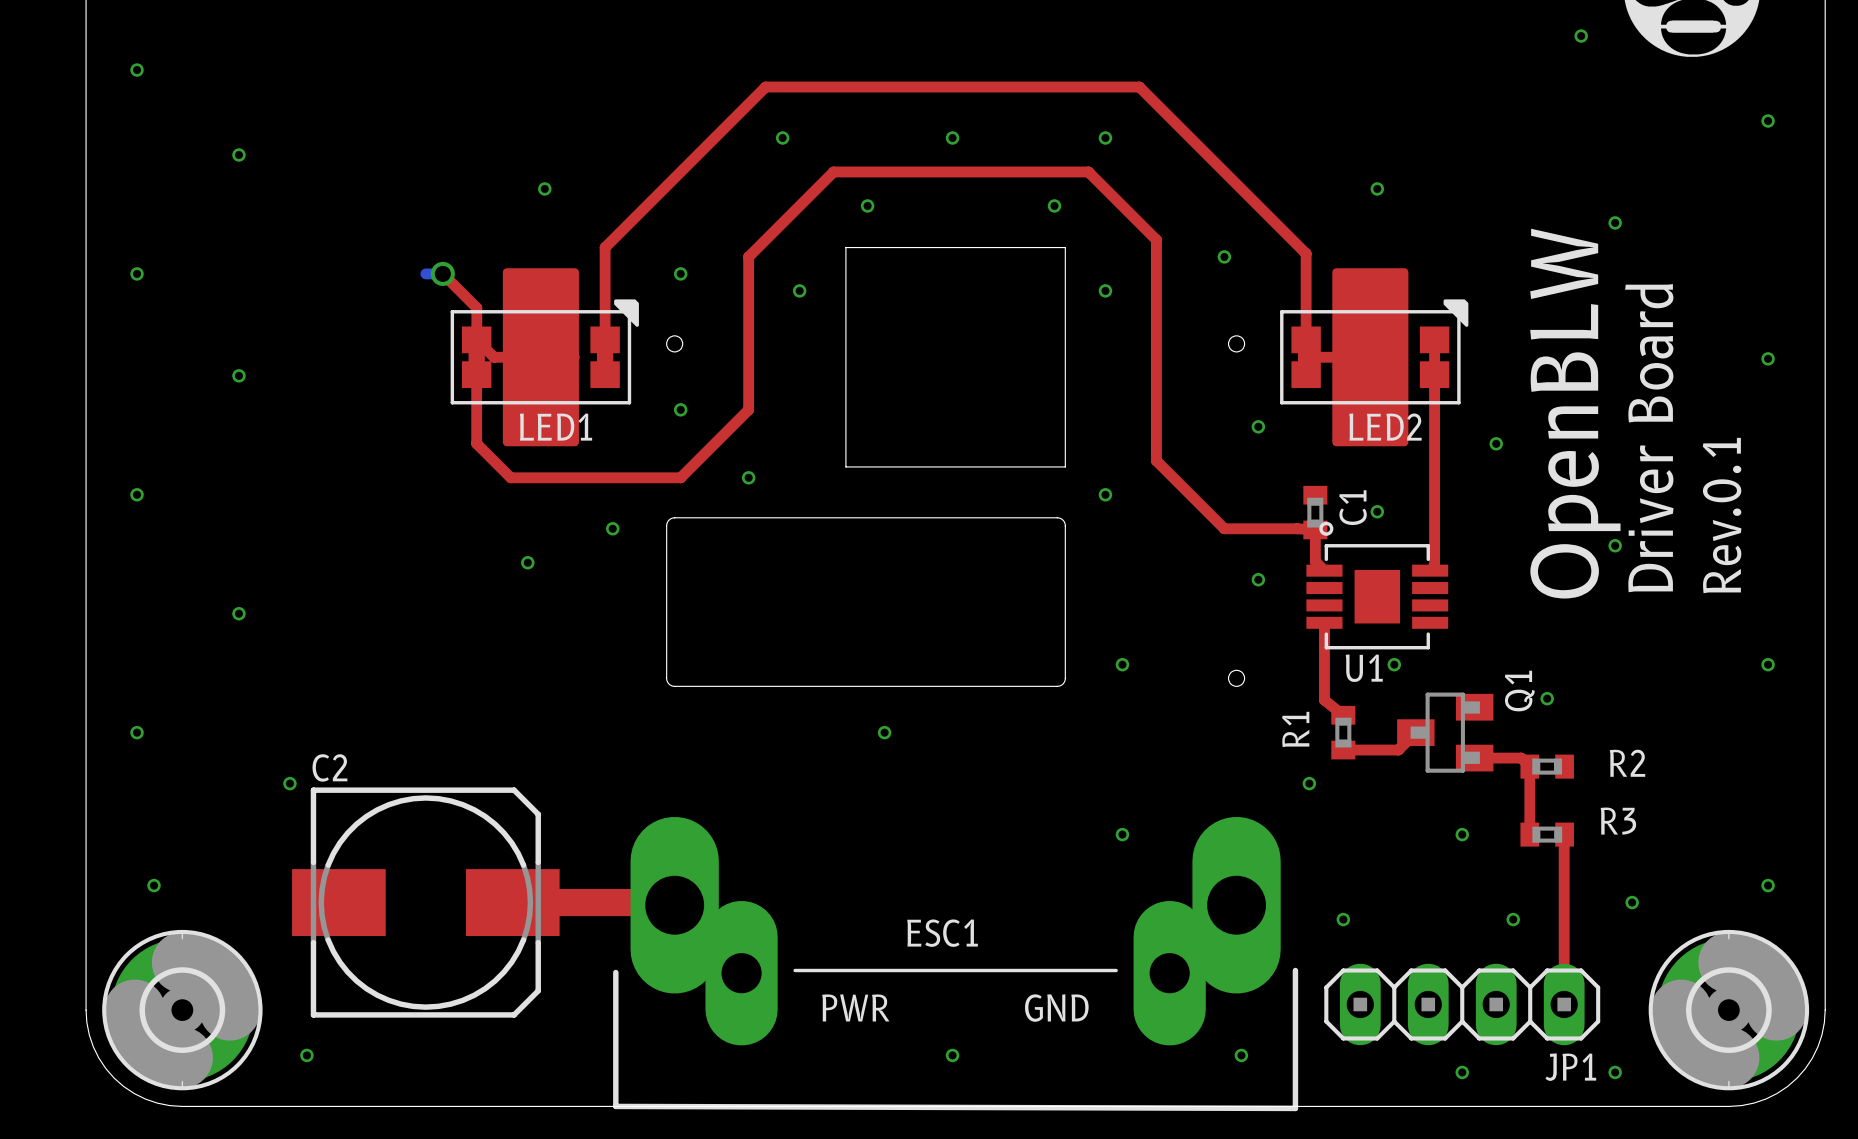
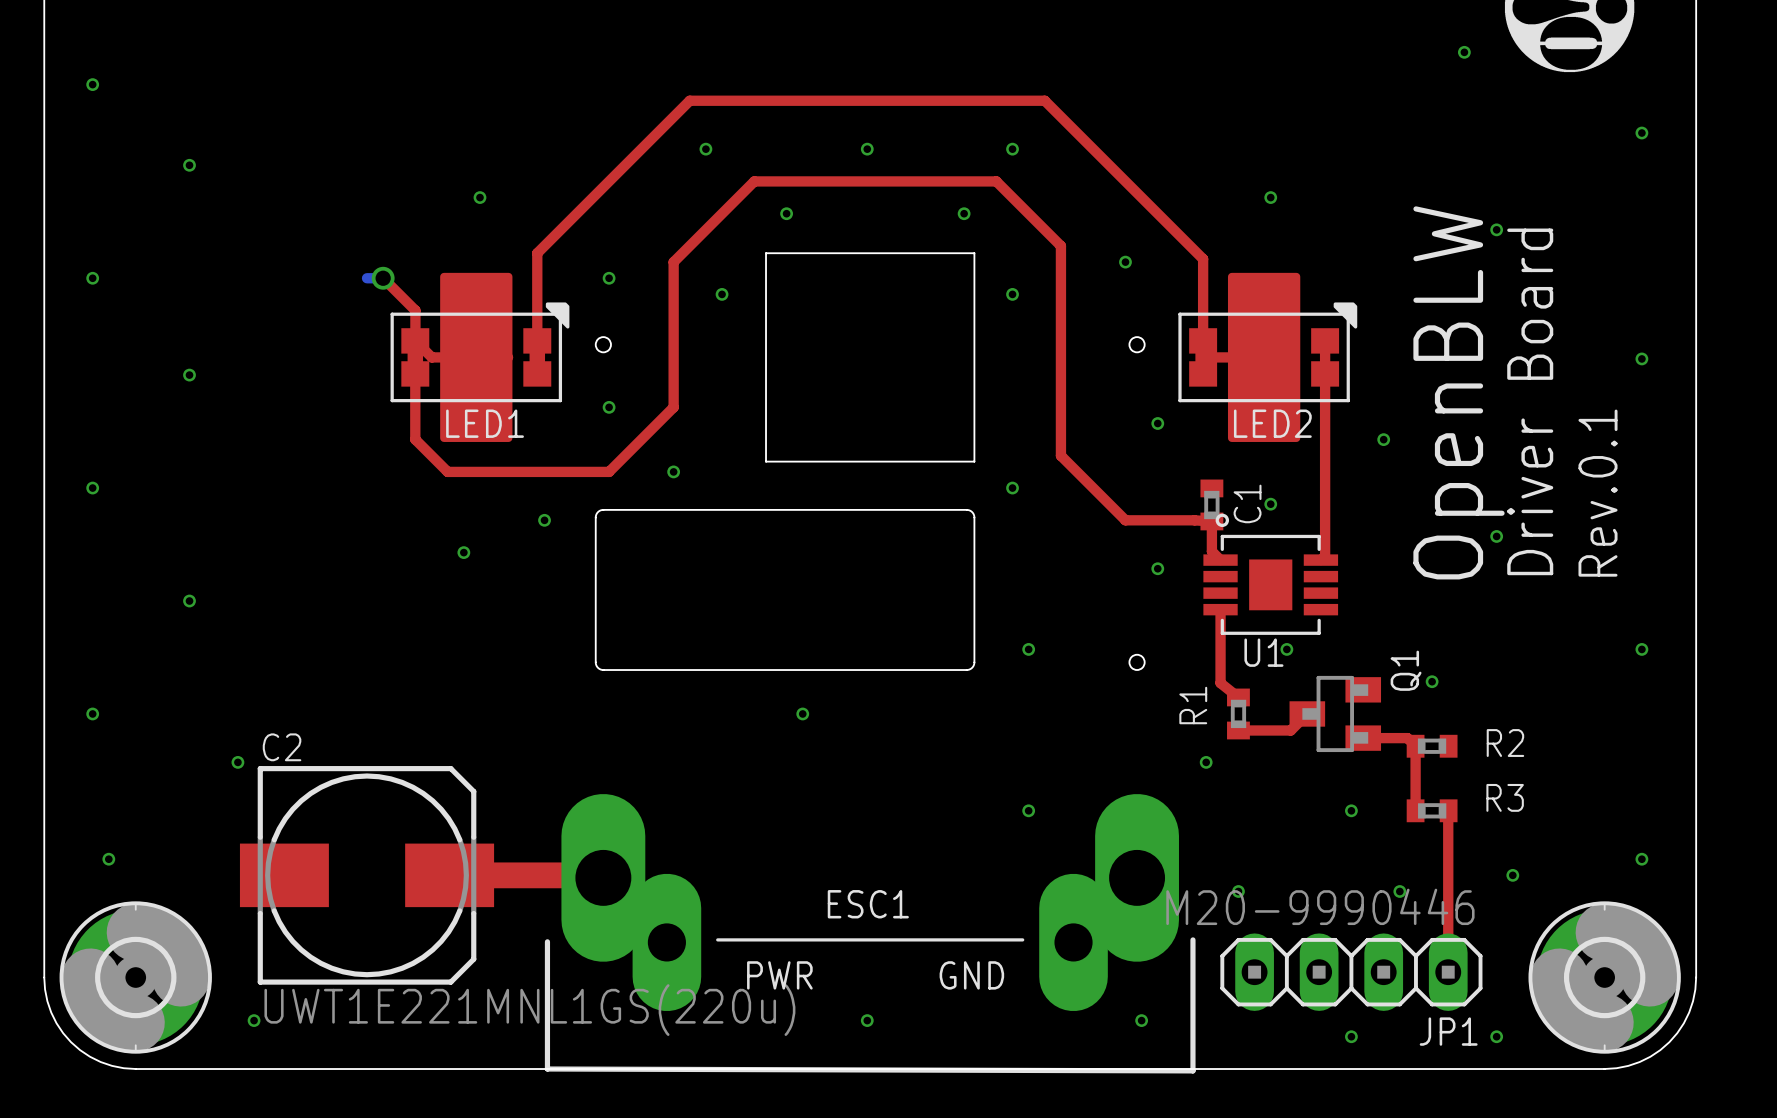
JP1 value: none -> M20-9990446 (1320, 906)
C2 value: none -> UWT1E221MNL1GS(220u) (529, 1010)

